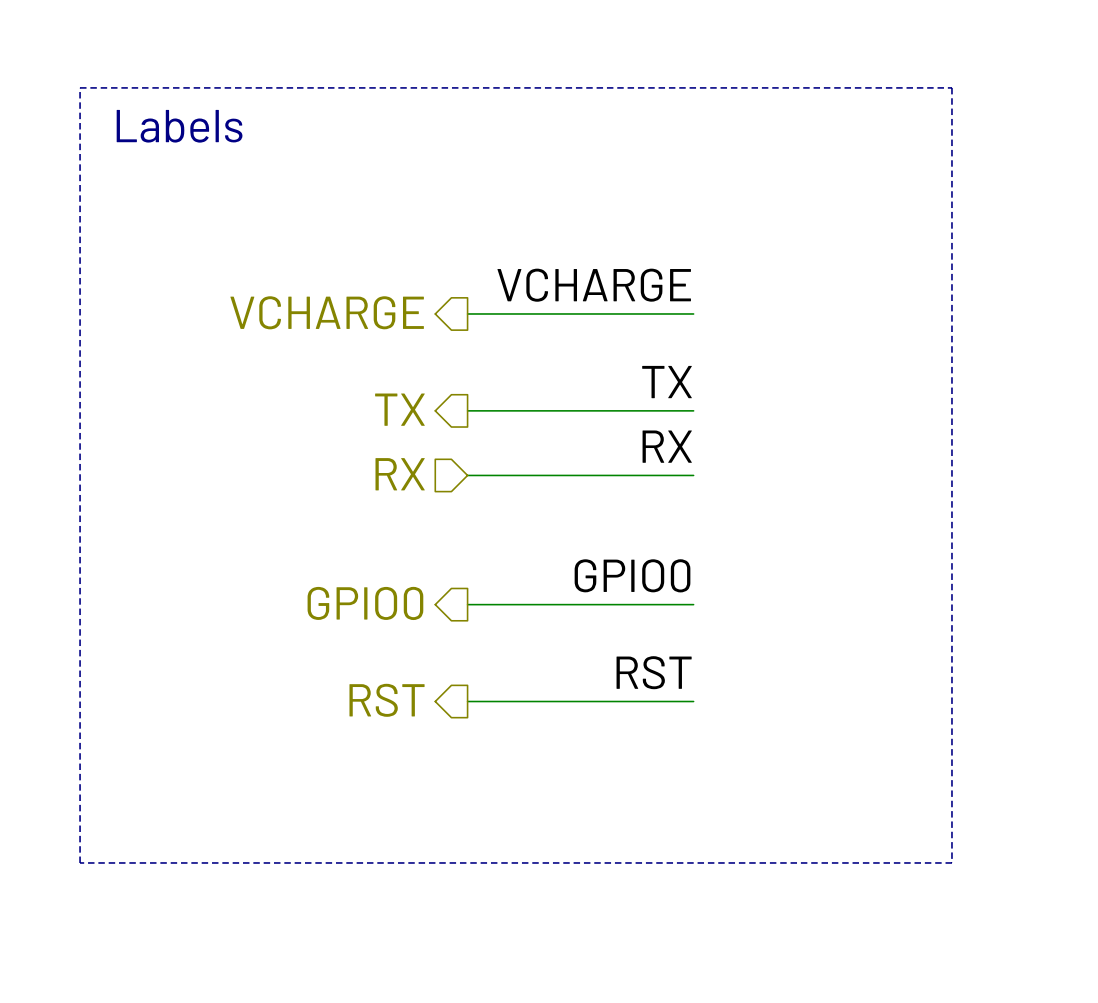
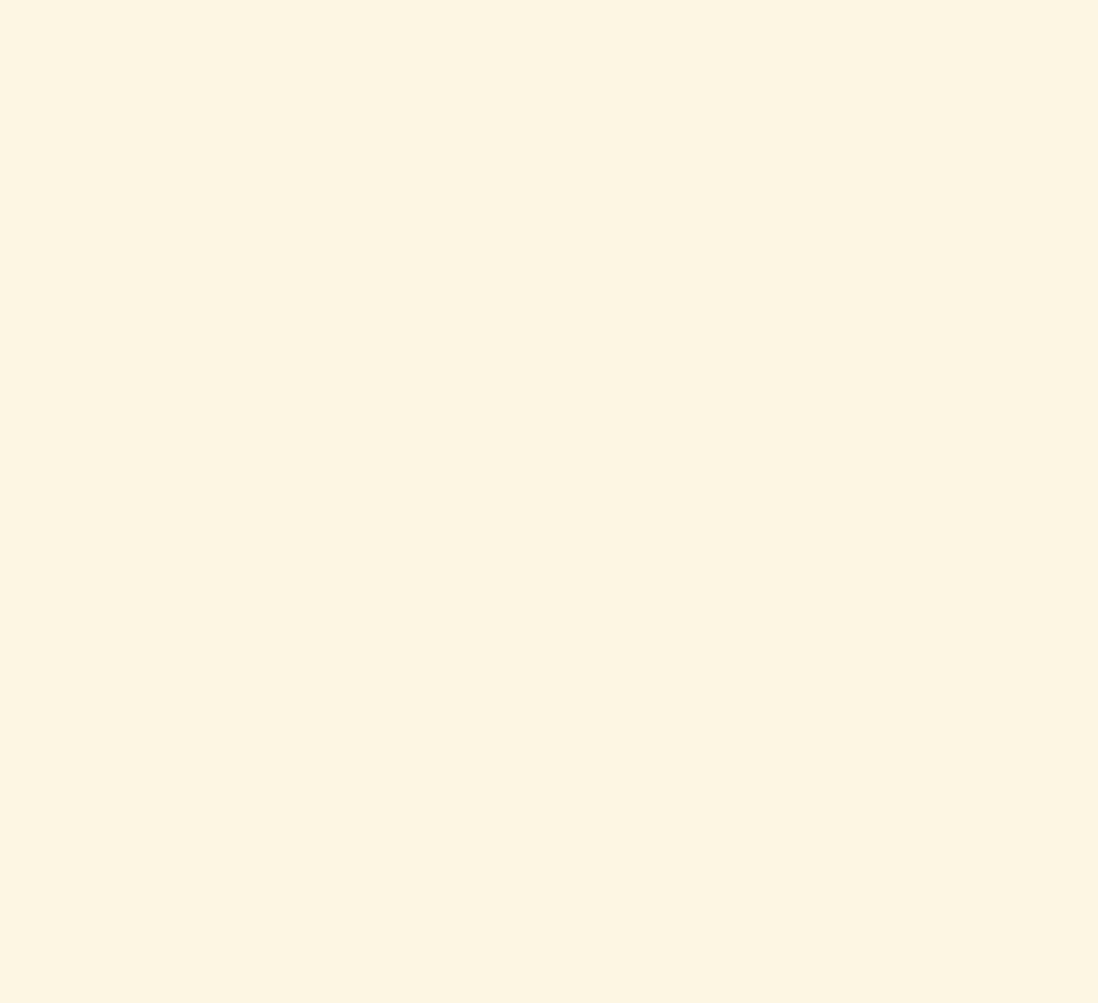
line: (80, 87) (951, 87) (951, 862) (80, 862) (80, 87) -> none
text: Labels (179, 126) -> none
label: VCHARGE (594, 285) -> none
hierarchical label: VCHARGE (327, 312) -> none
wire: (467, 313) (693, 313) -> none
label: TX (667, 382) -> none
hierarchical label: TX (399, 409) -> none
wire: (467, 410) (693, 410) -> none
label: RX (667, 446) -> none
hierarchical label: RX (400, 474) -> none
wire: (467, 475) (693, 475) -> none
label: GPIO0 (632, 575) -> none
hierarchical label: GPIO0 (365, 603) -> none
wire: (467, 604) (693, 604) -> none
label: RST (654, 672) -> none
hierarchical label: RST (387, 700) -> none
wire: (467, 701) (693, 701) -> none

